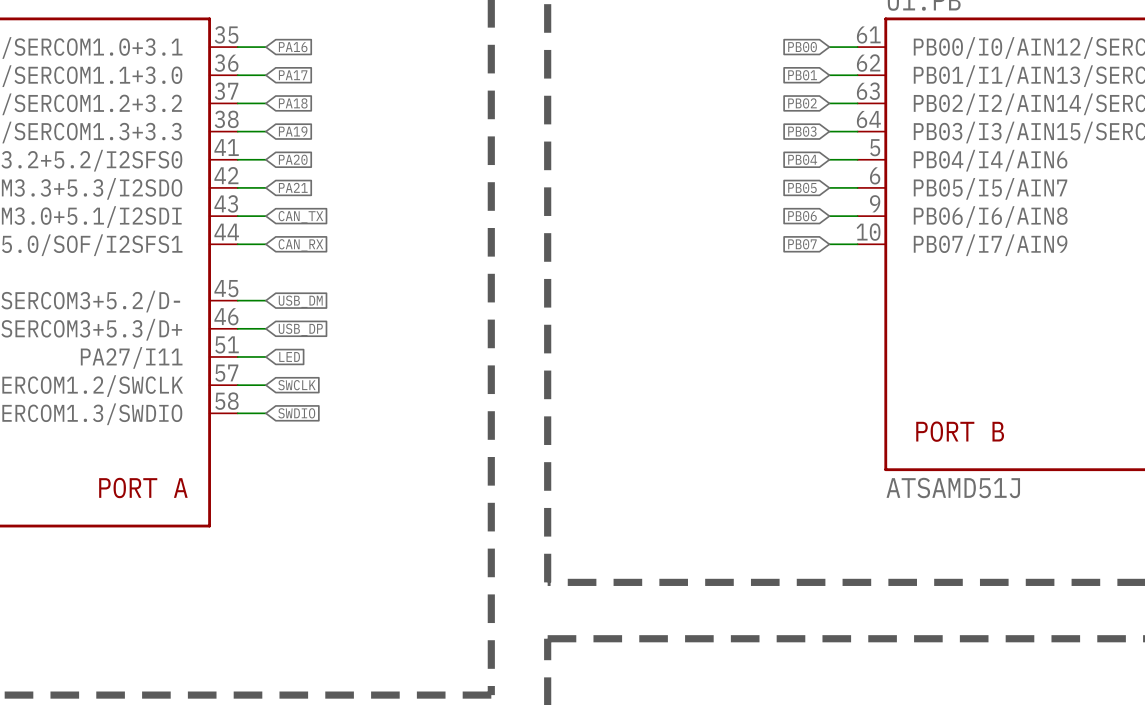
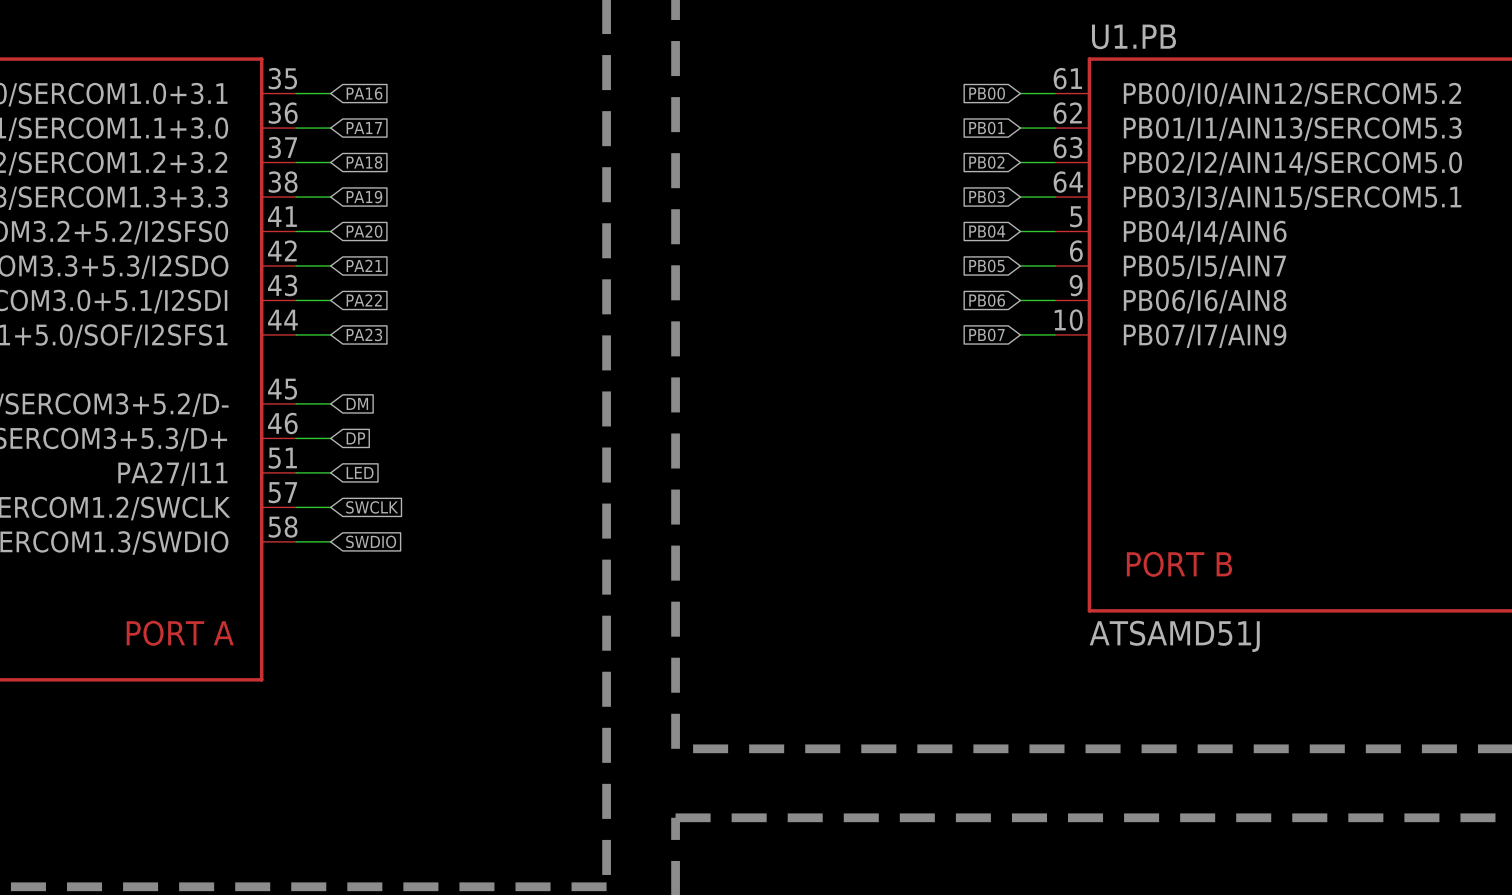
global label: CAN_TX (300, 217) -> PA22 (364, 300)
global label: CAN_RX (300, 245) -> PA23 (364, 334)
global label: USB_DM (300, 301) -> DM (357, 403)
global label: USB_DP (300, 329) -> DP (355, 438)

